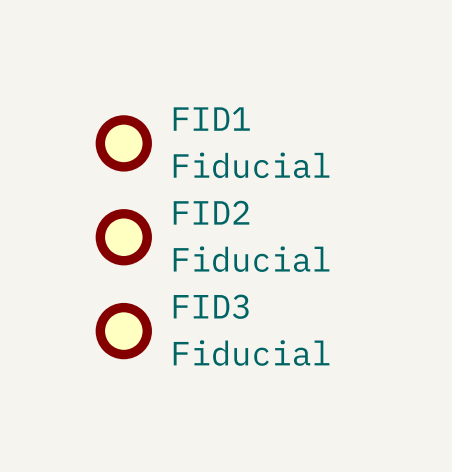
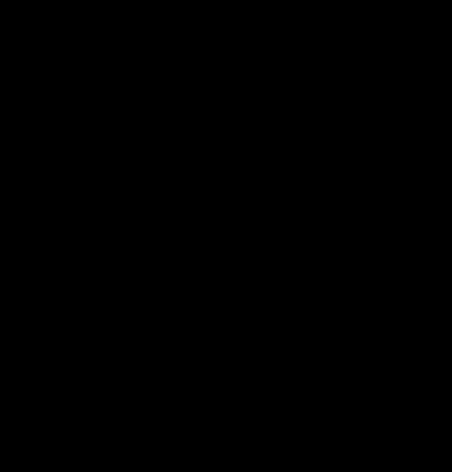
FID1: Fiducial (123, 143) -> none
FID2: Fiducial (123, 237) -> none
FID3: Fiducial (123, 331) -> none

